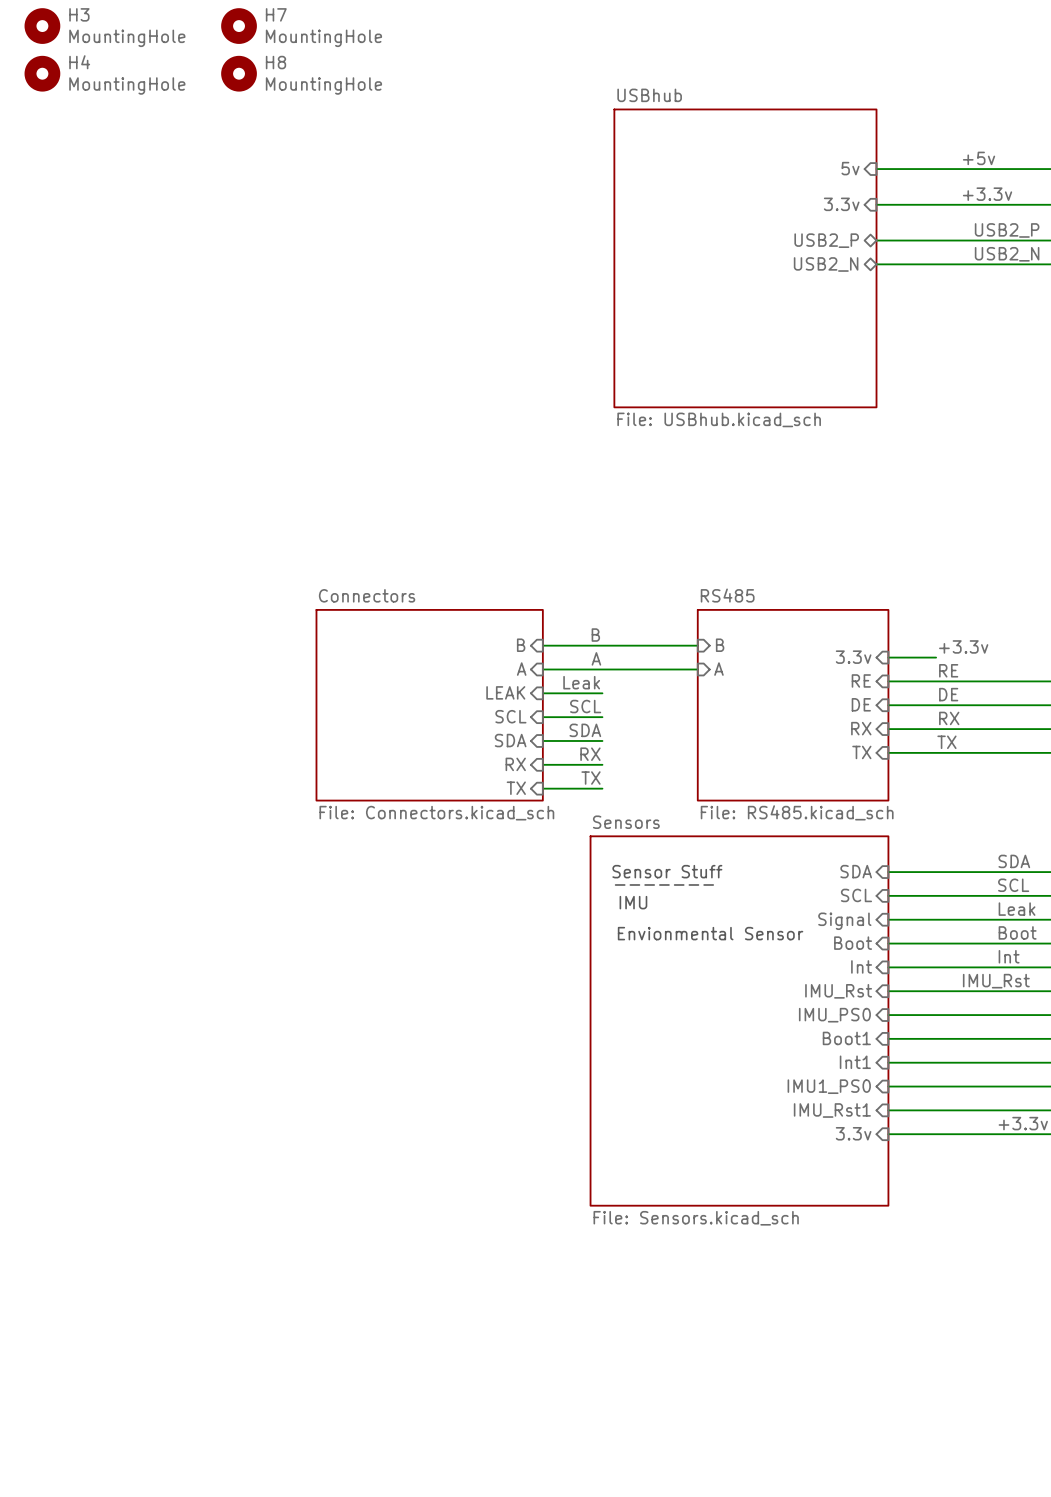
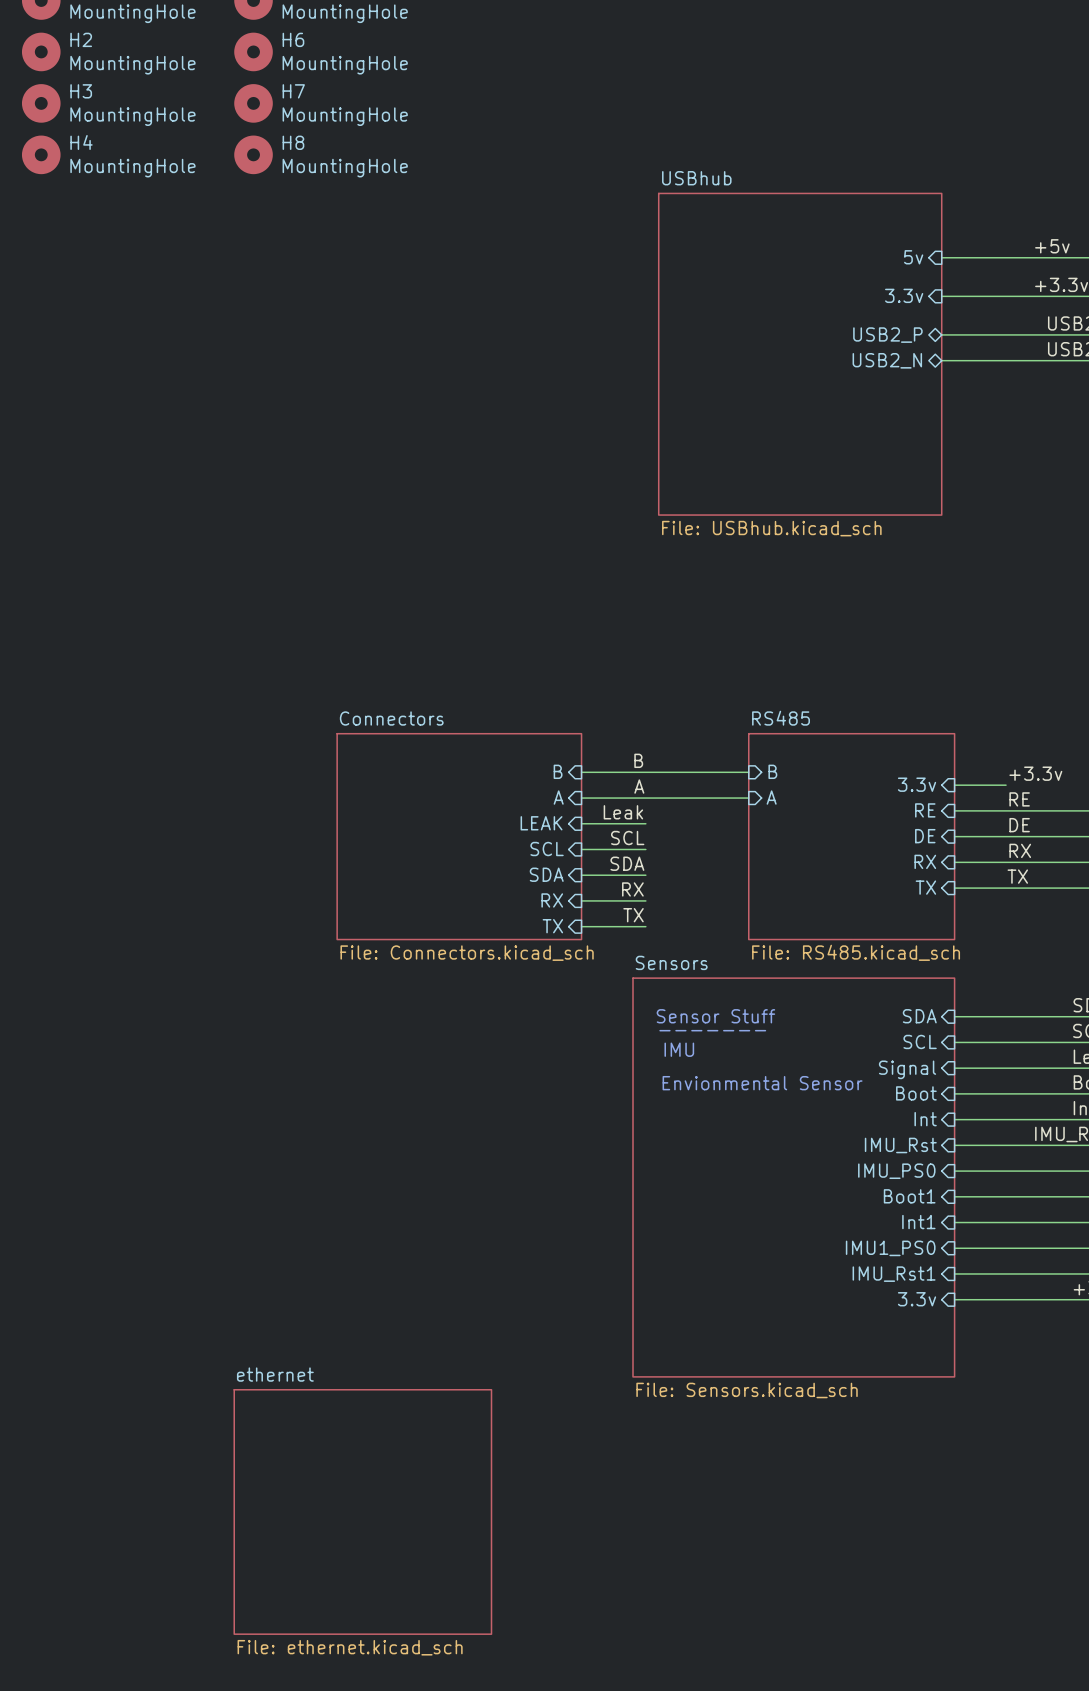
sheet ethernet: none -> File: ethernet.kicad_sch (362, 1511)

